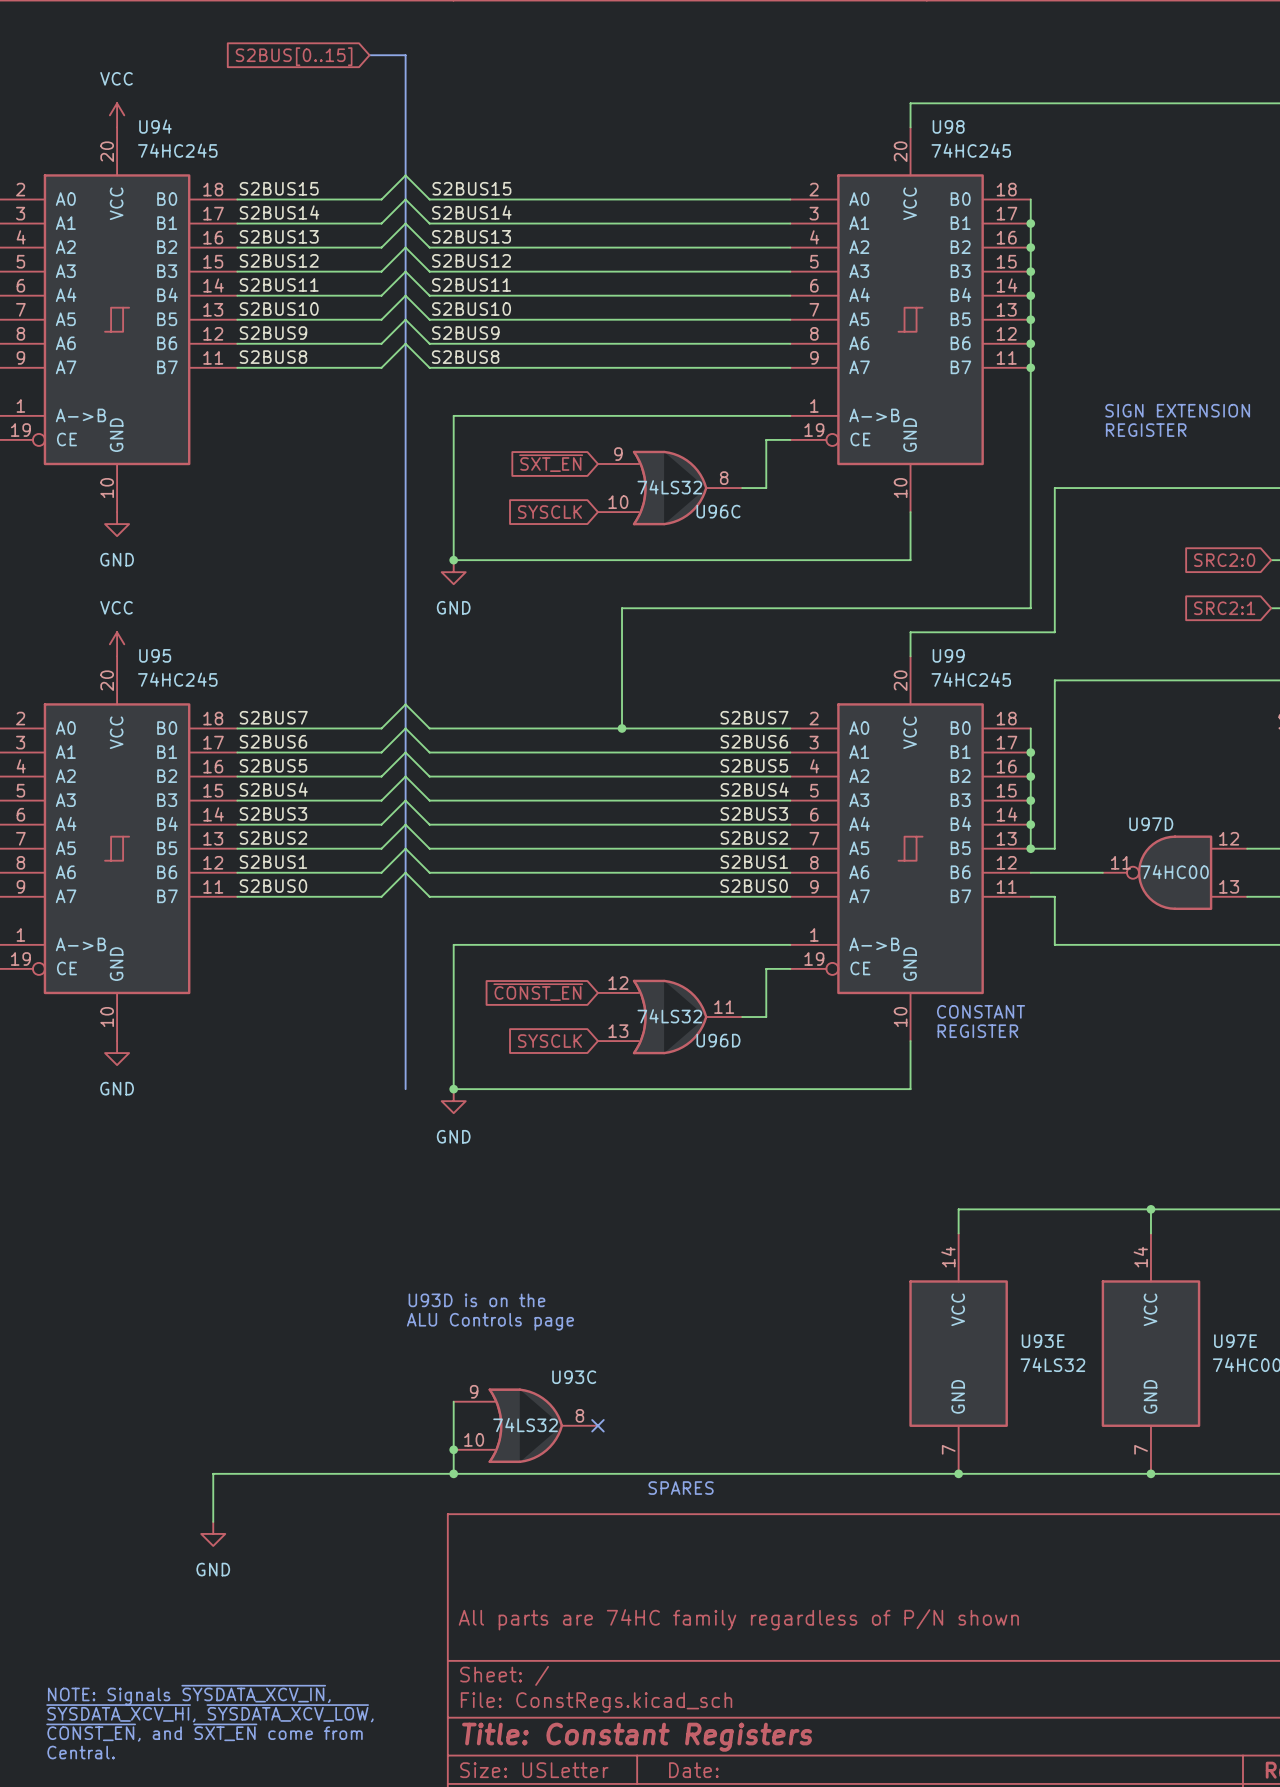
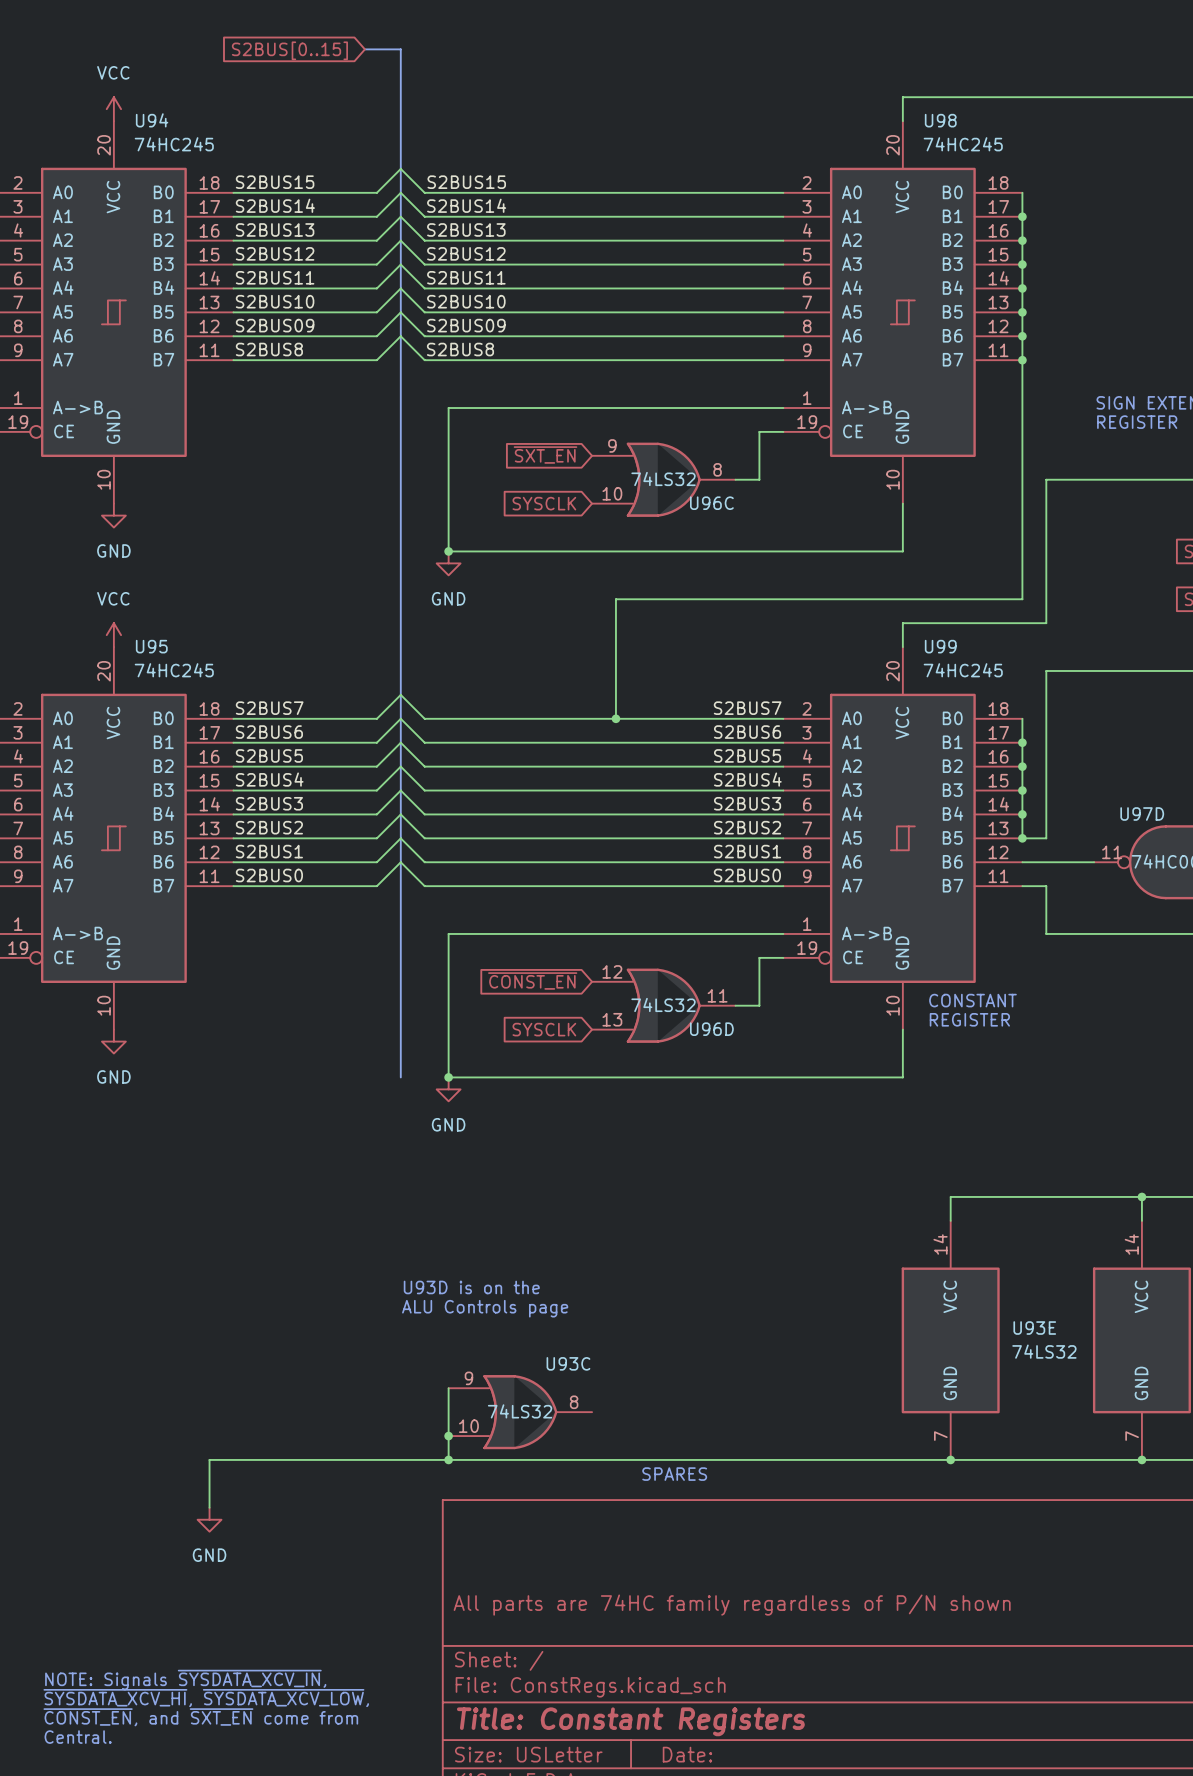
label: S2BUS9 (273, 333) -> S2BUS09 (275, 325)
label: S2BUS9 (465, 333) -> S2BUS09 (466, 325)
no-connect mark: (597, 1425) -> none

